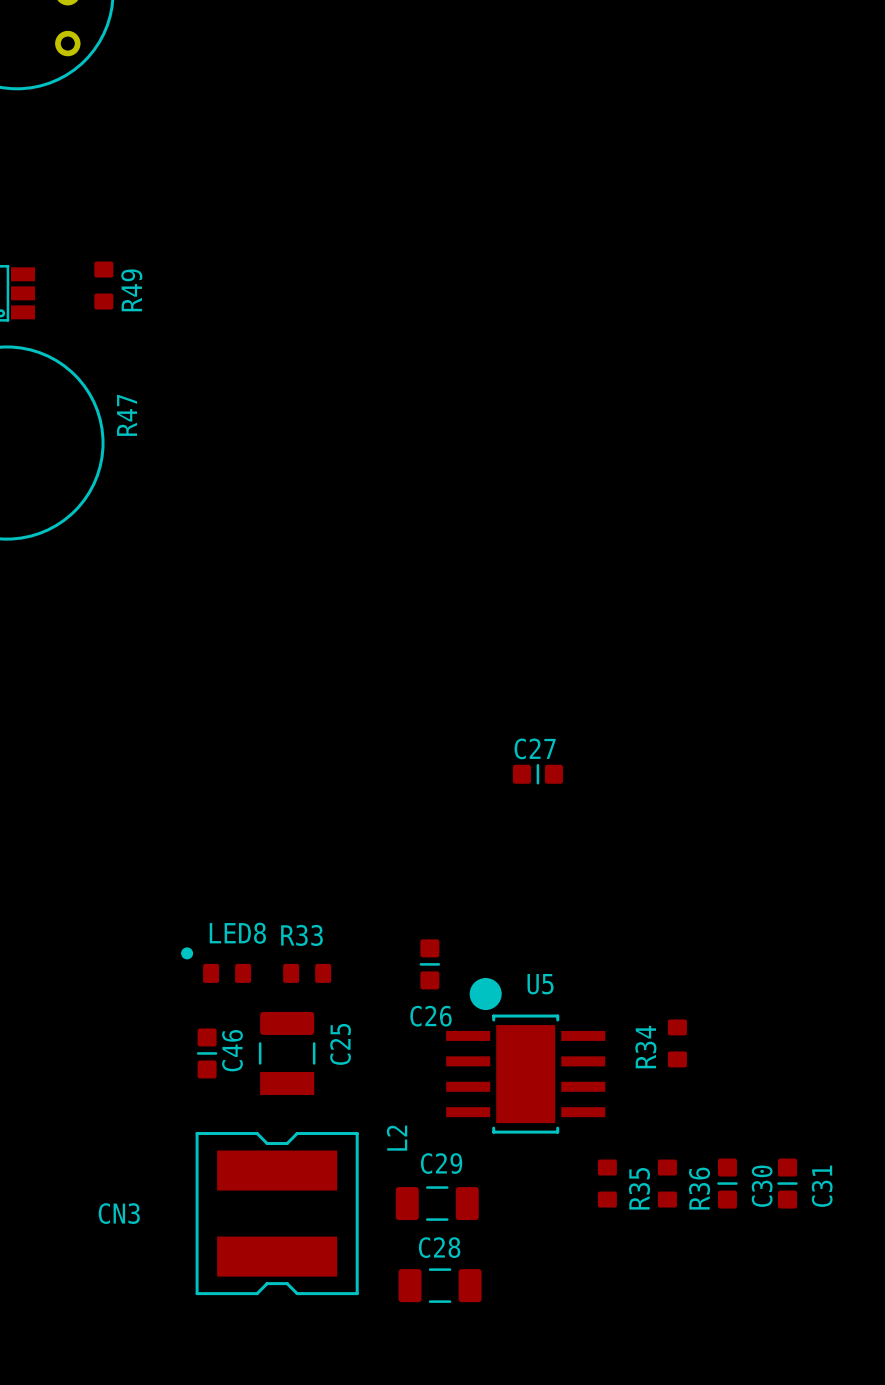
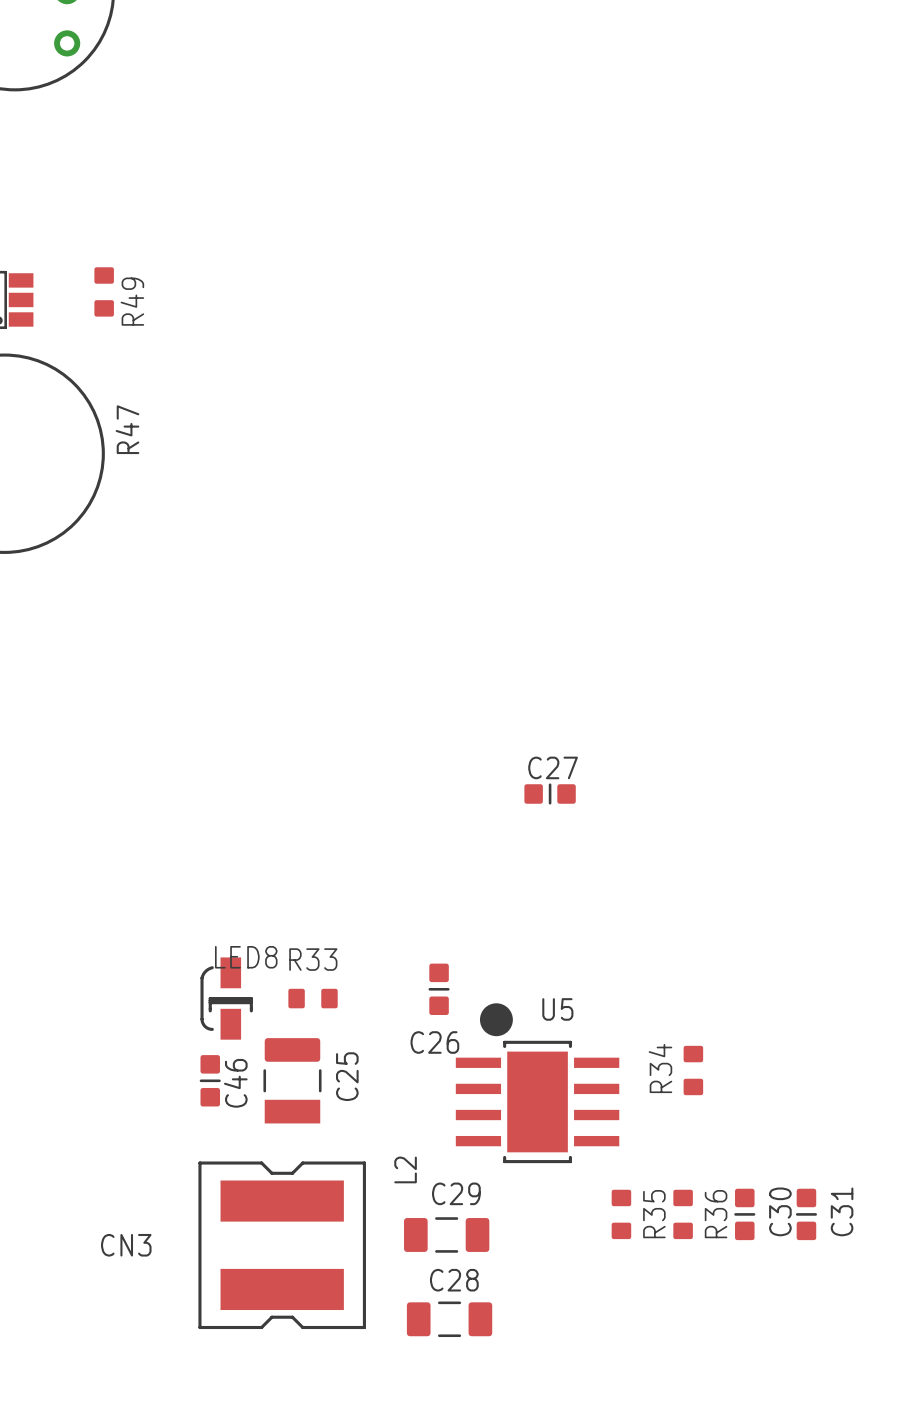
LED8 footprint: [181, 947, 252, 983] -> [200, 957, 253, 1040]

